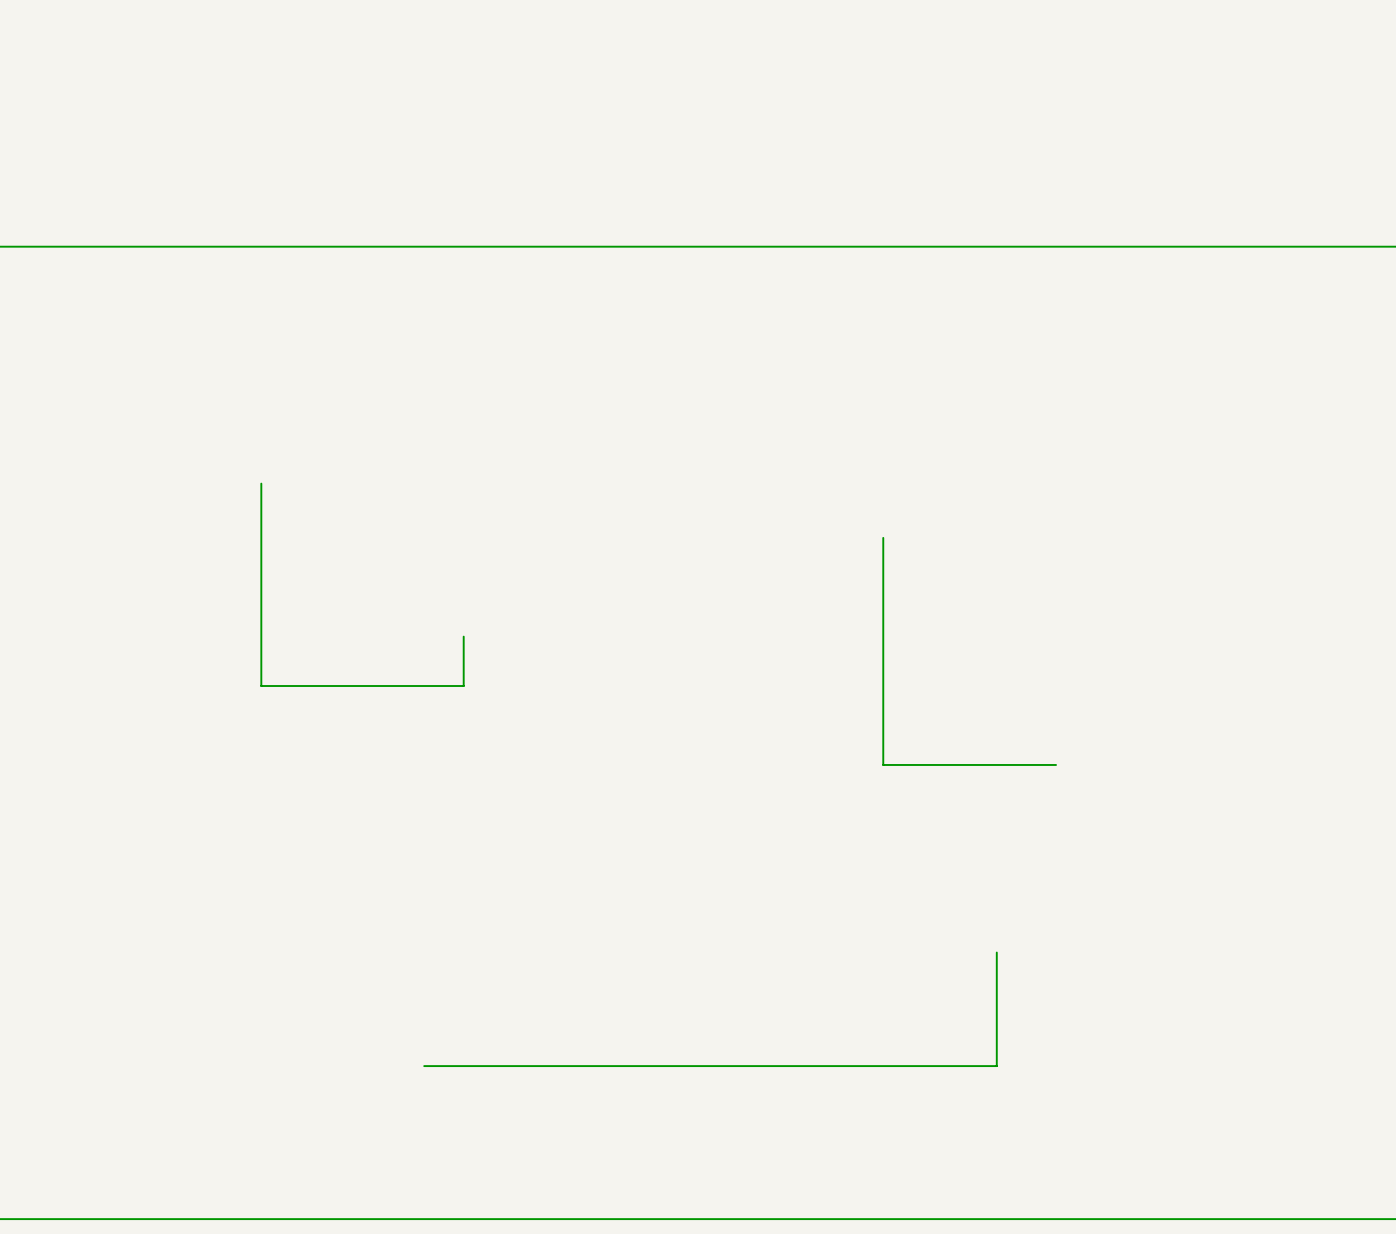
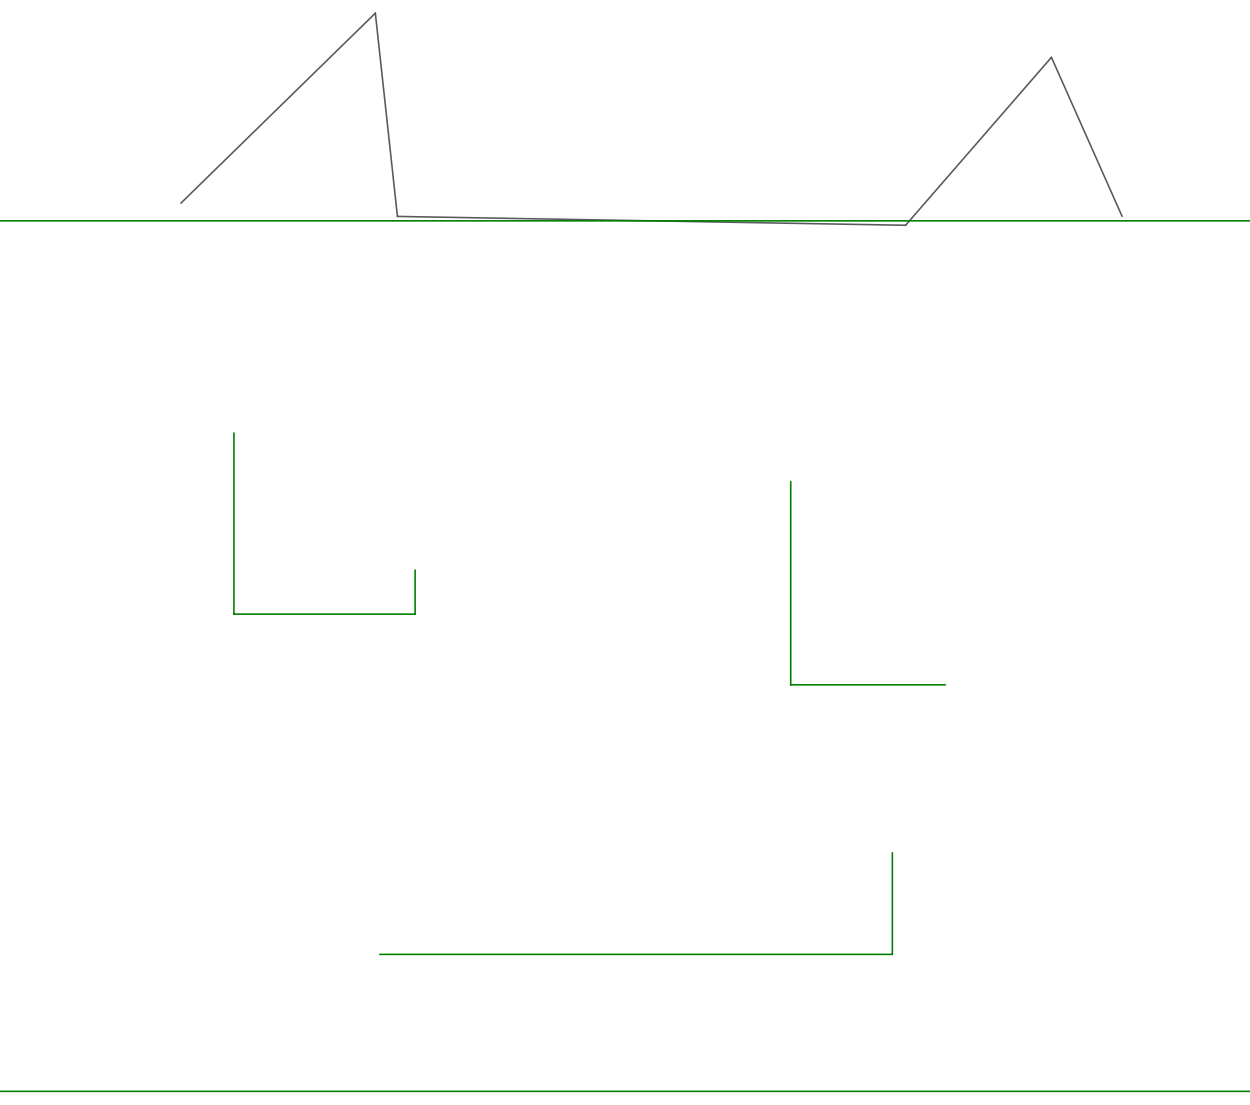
bus: none -> (180, 203) (375, 13) (397, 216) (905, 225) (1051, 57) (1122, 216)

